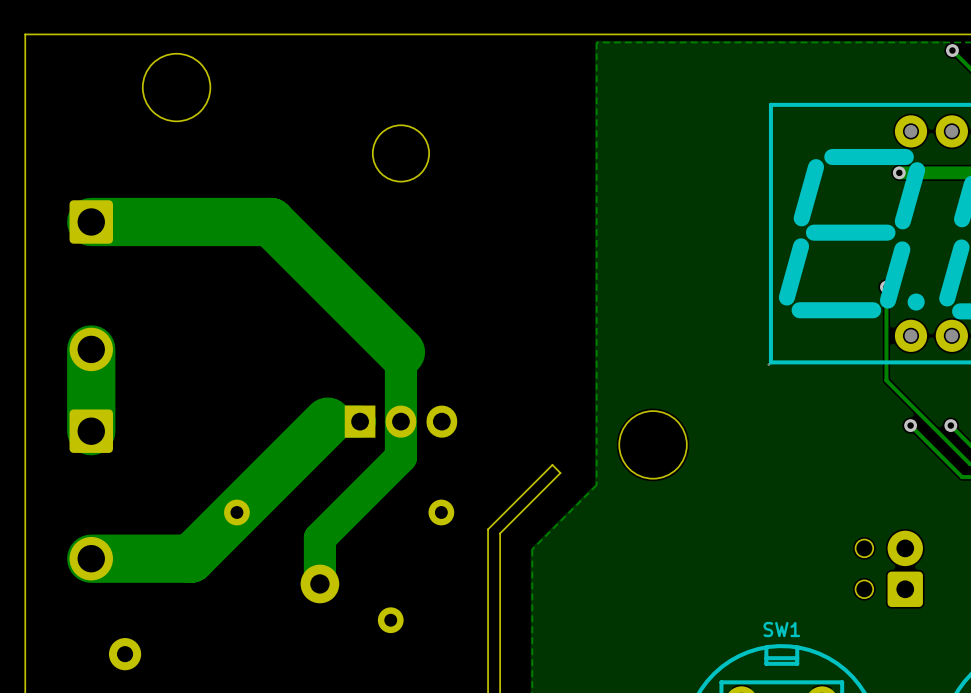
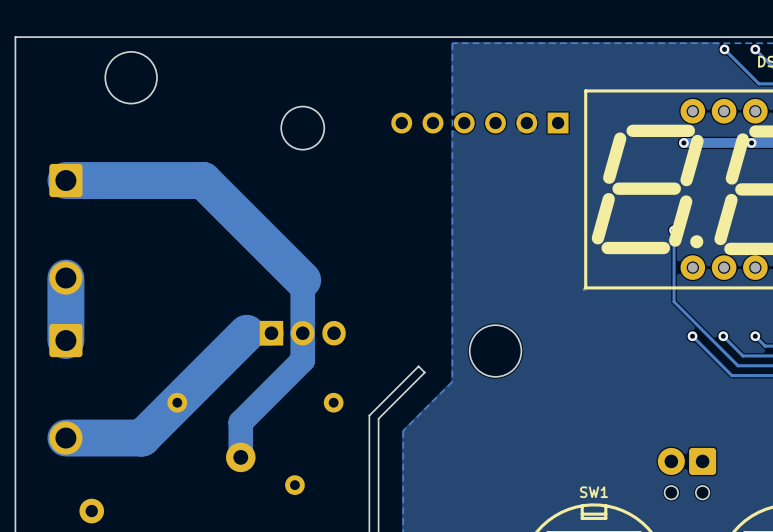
part: none -> (479, 123)
part rotation: 0° (889, 568) -> 90° counterclockwise (686, 473)

